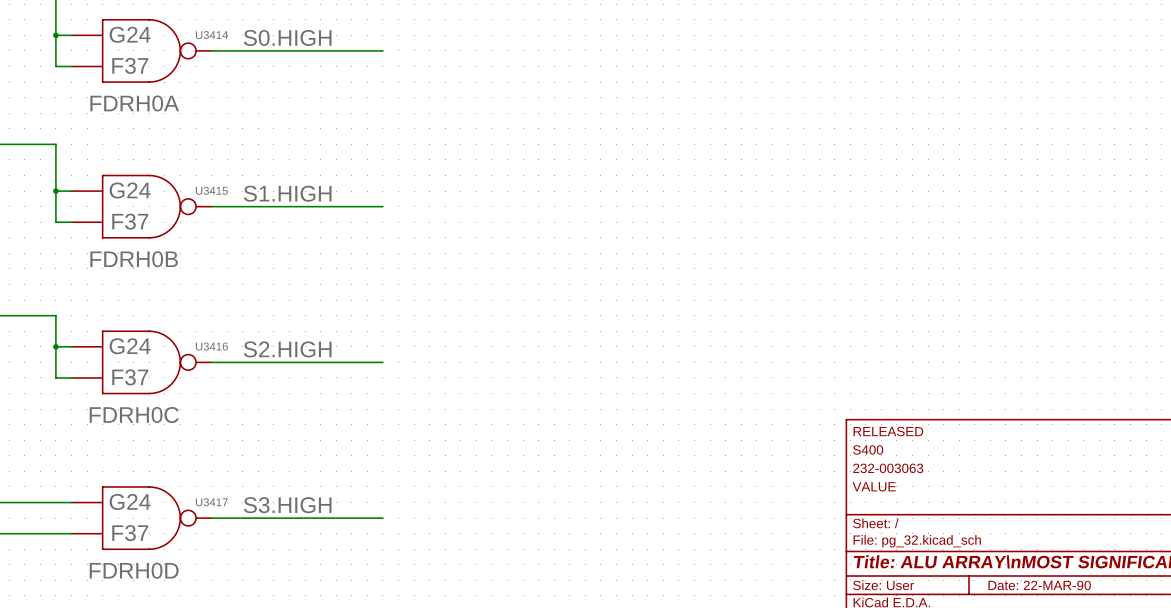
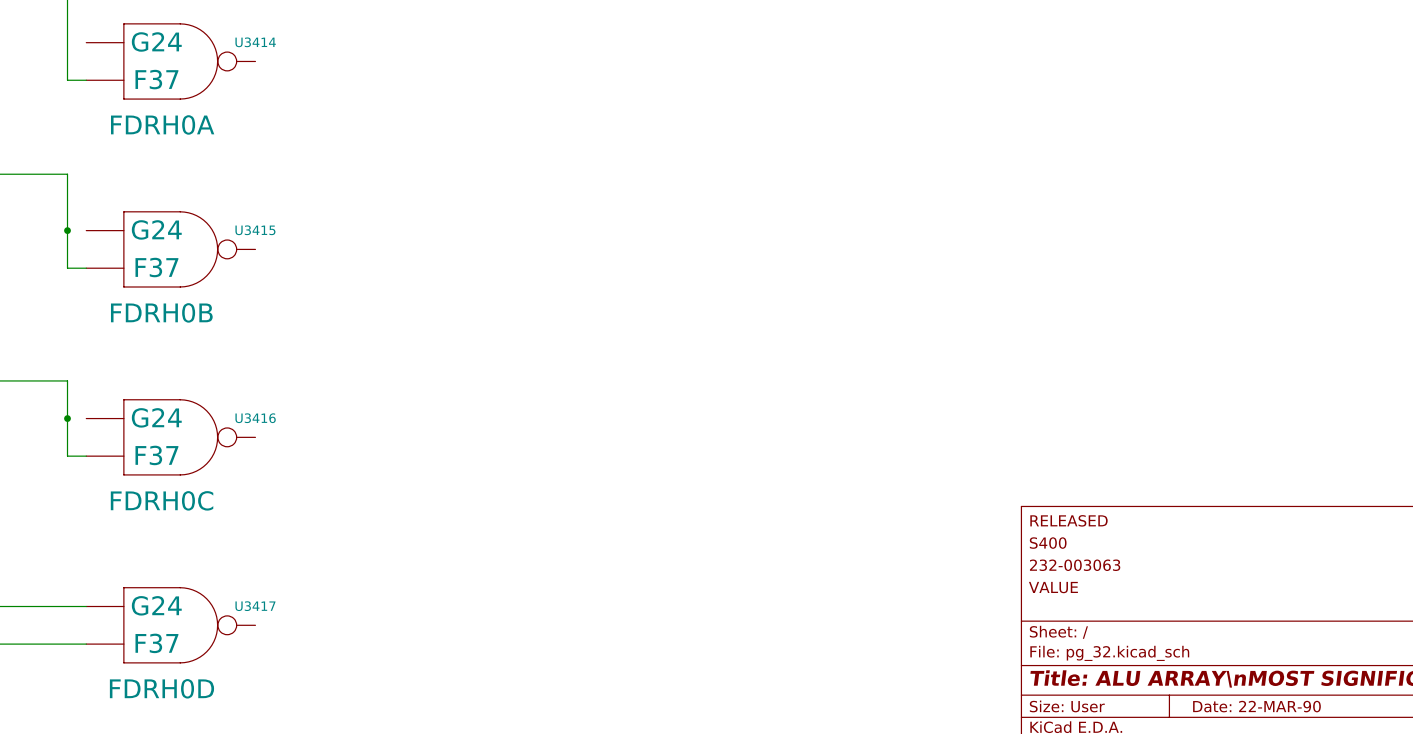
wire: (55, 35) (71, 35) -> none
junction: (55, 35) -> none
label: S0.HIGH (287, 37) -> none
wire: (211, 50) (382, 50) -> none
wire: (55, 191) (71, 191) -> none
label: S1.HIGH (287, 193) -> none
wire: (211, 206) (382, 206) -> none
wire: (55, 346) (71, 346) -> none
label: S2.HIGH (287, 349) -> none
wire: (211, 362) (382, 362) -> none
label: S3.HIGH (287, 505) -> none
wire: (211, 518) (382, 518) -> none

